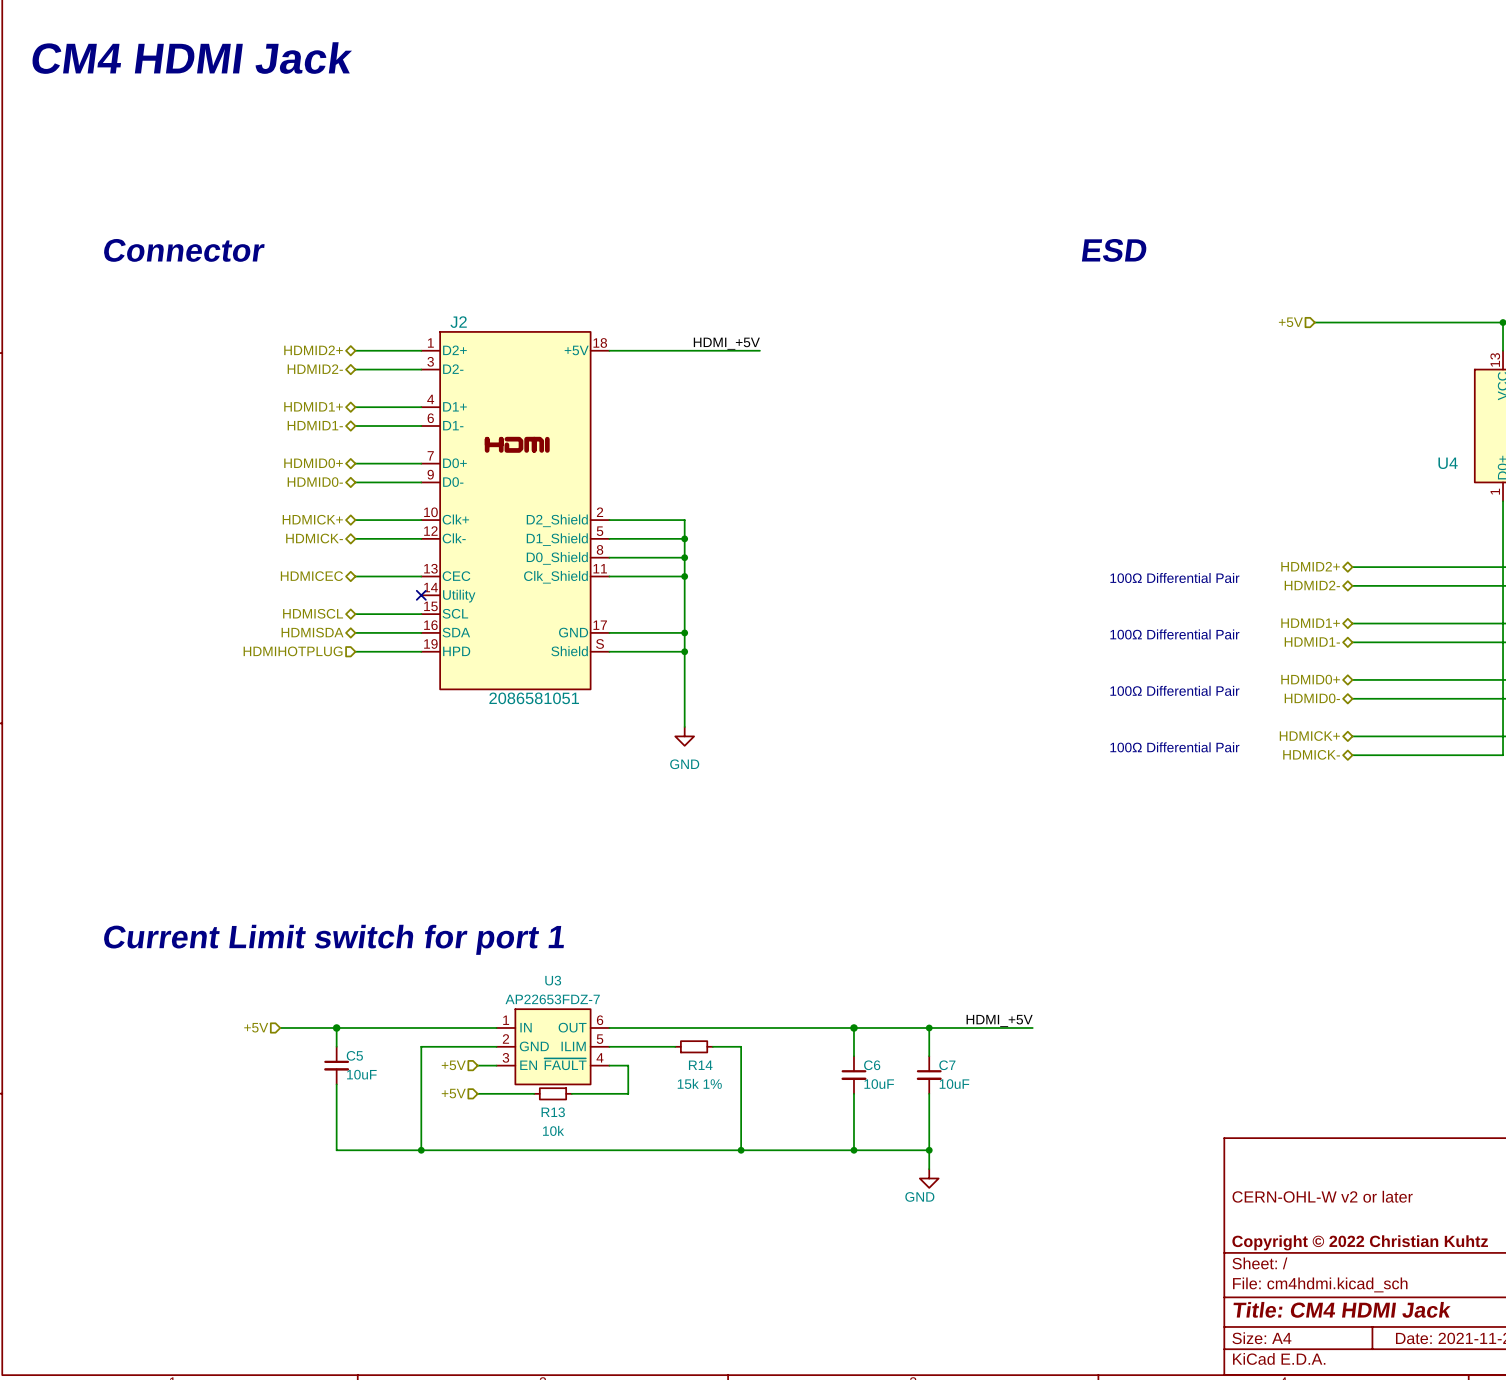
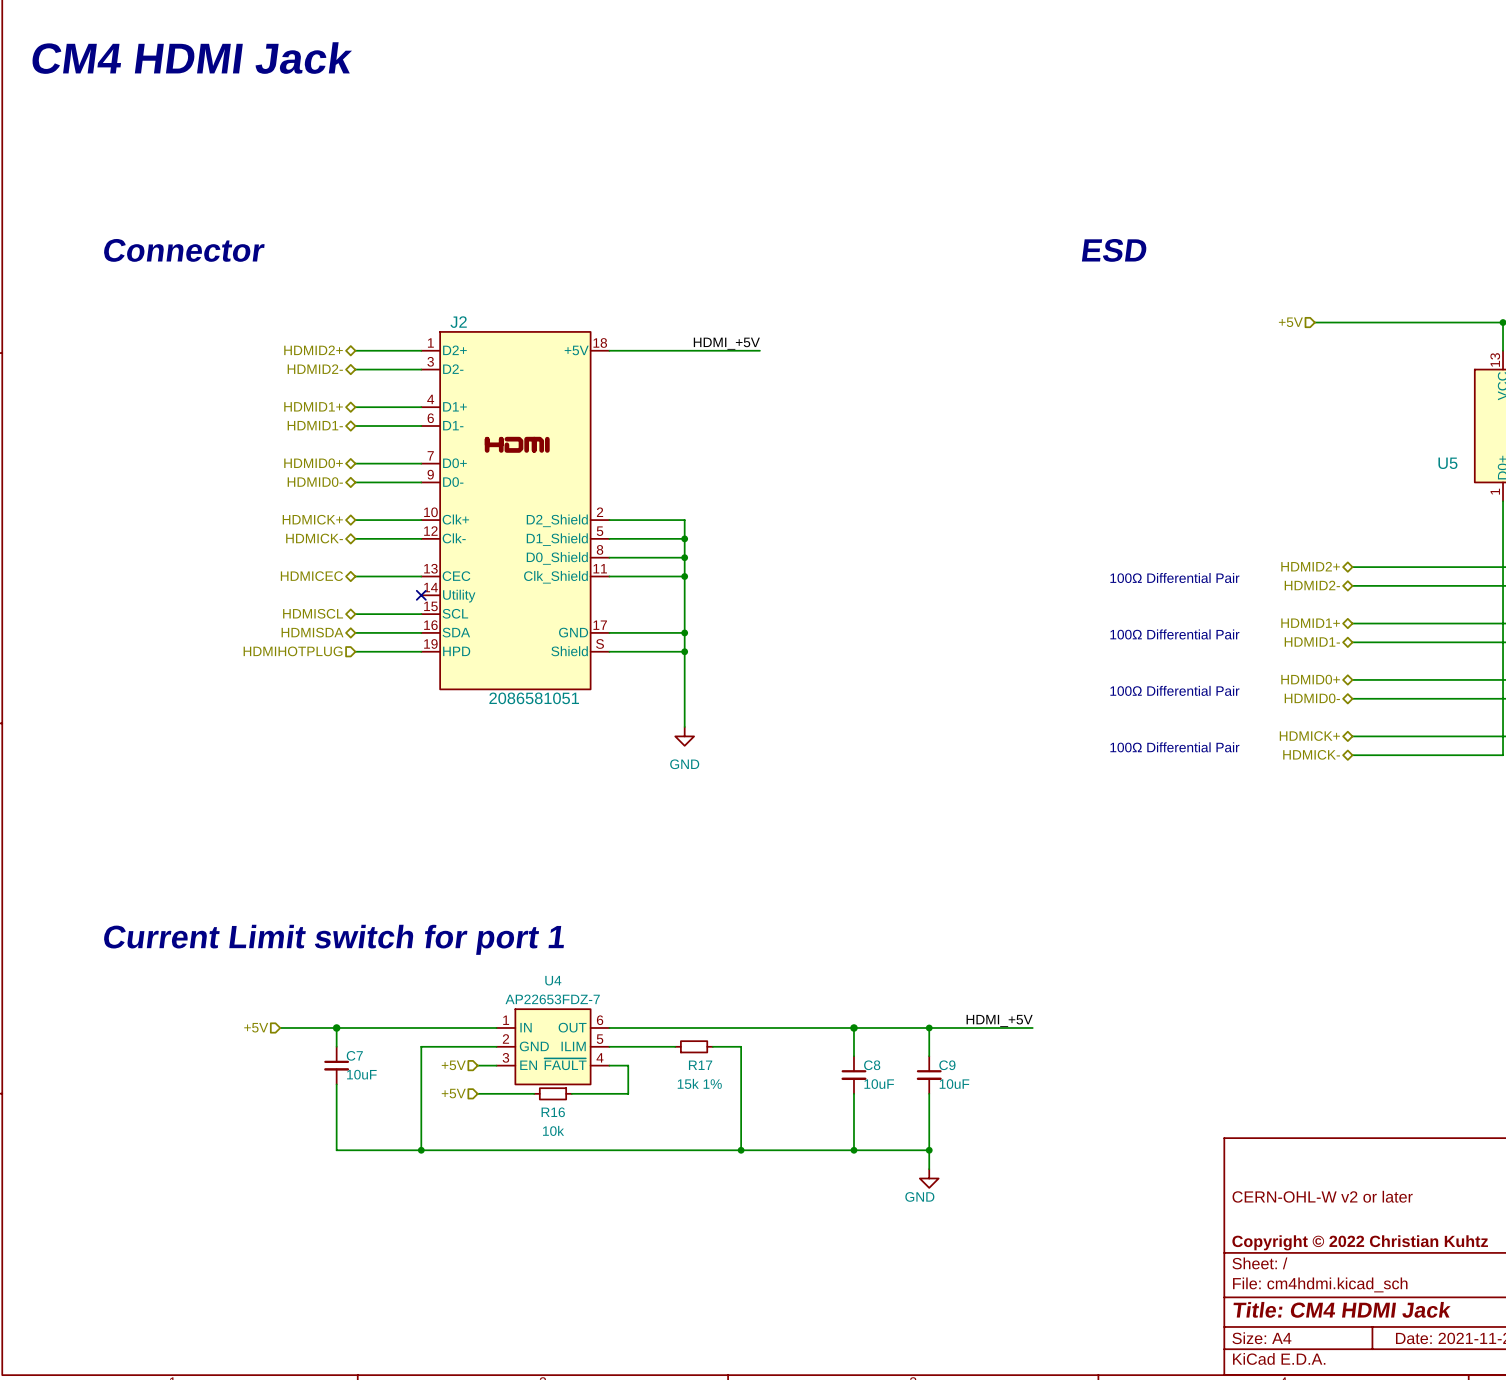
U4 name: U4 (1448, 463) -> U5 (1447, 463)
U3 name: U3 (553, 980) -> U4 (553, 980)
C5 name: C5 (354, 1055) -> C7 (354, 1055)
R14 name: R14 (700, 1065) -> R17 (700, 1065)
C6 name: C6 (872, 1065) -> C8 (872, 1065)
C7 name: C7 (947, 1065) -> C9 (947, 1065)
R13 name: R13 (553, 1112) -> R16 (553, 1112)

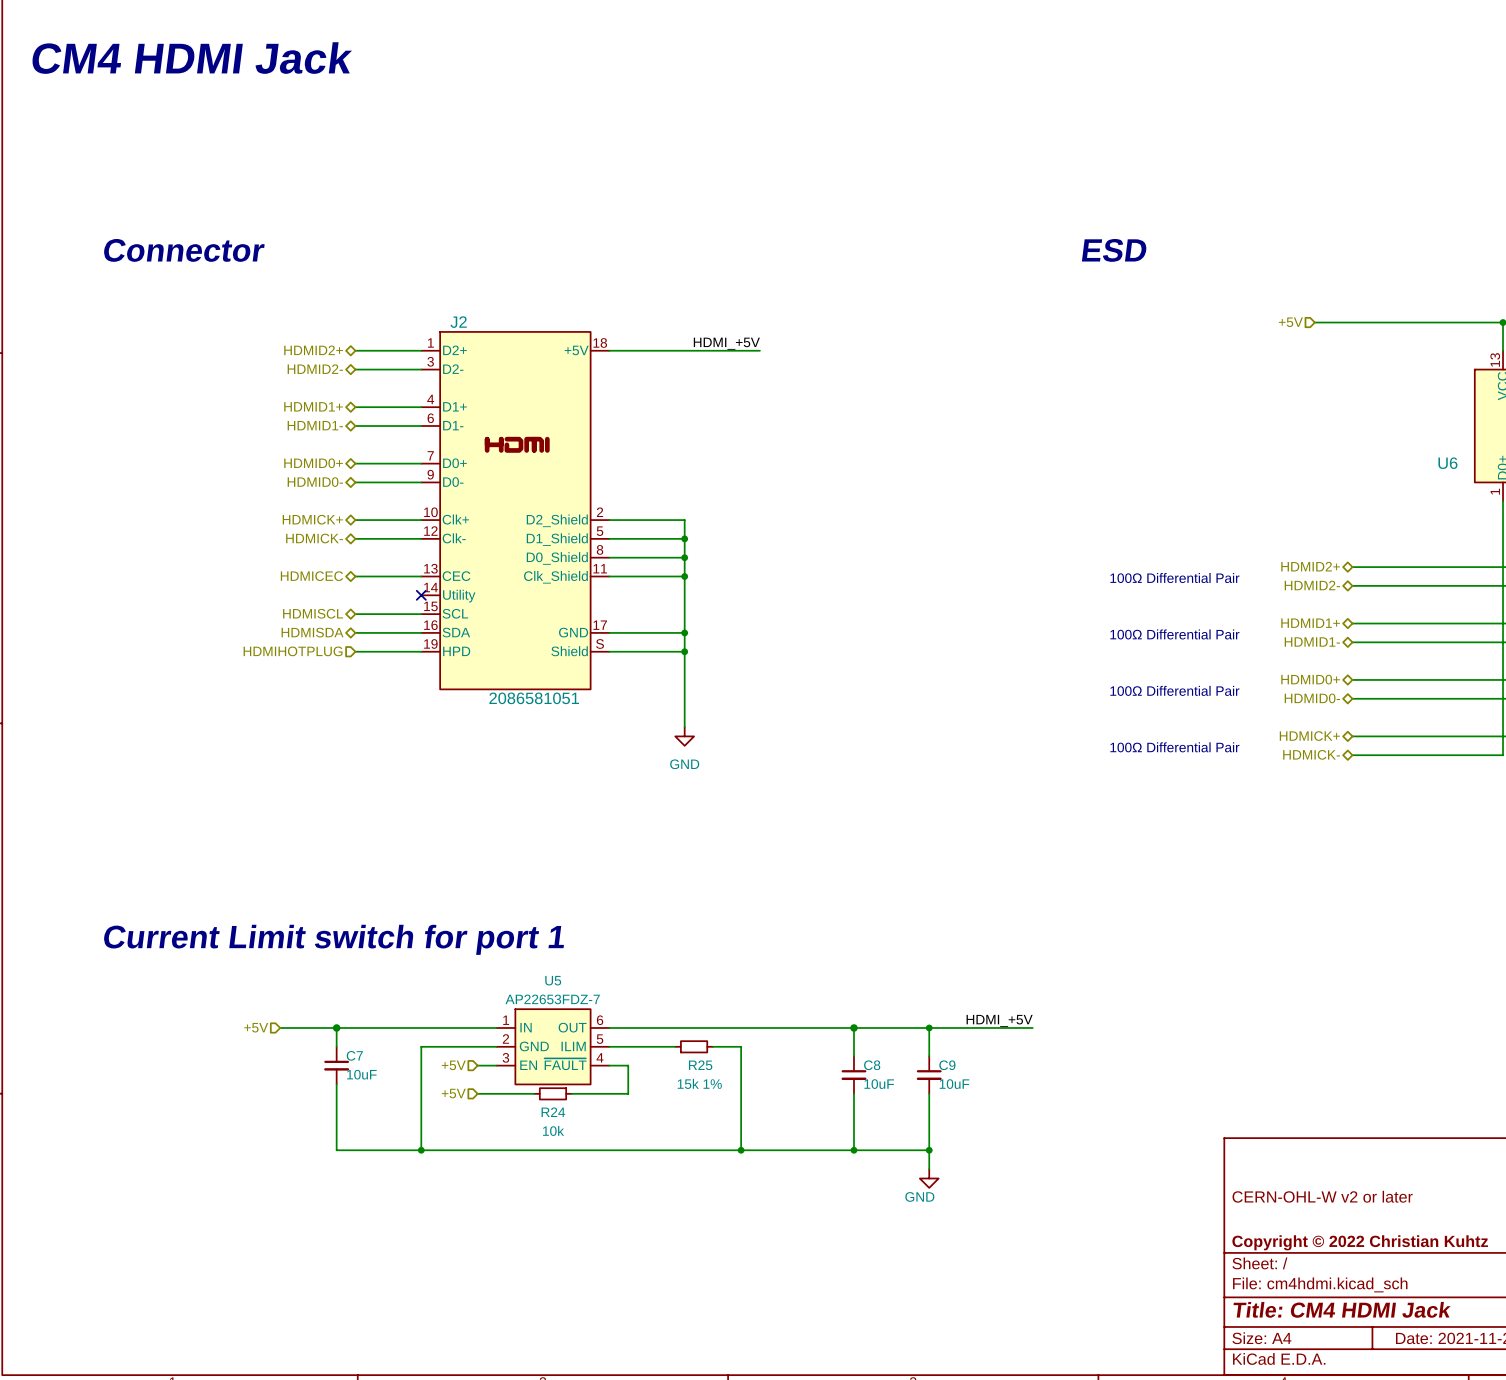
U5 name: U5 (1447, 463) -> U6 (1447, 463)
U4 name: U4 (553, 980) -> U5 (553, 980)
R17 name: R17 (700, 1065) -> R25 (700, 1065)
R16 name: R16 (553, 1112) -> R24 (553, 1112)

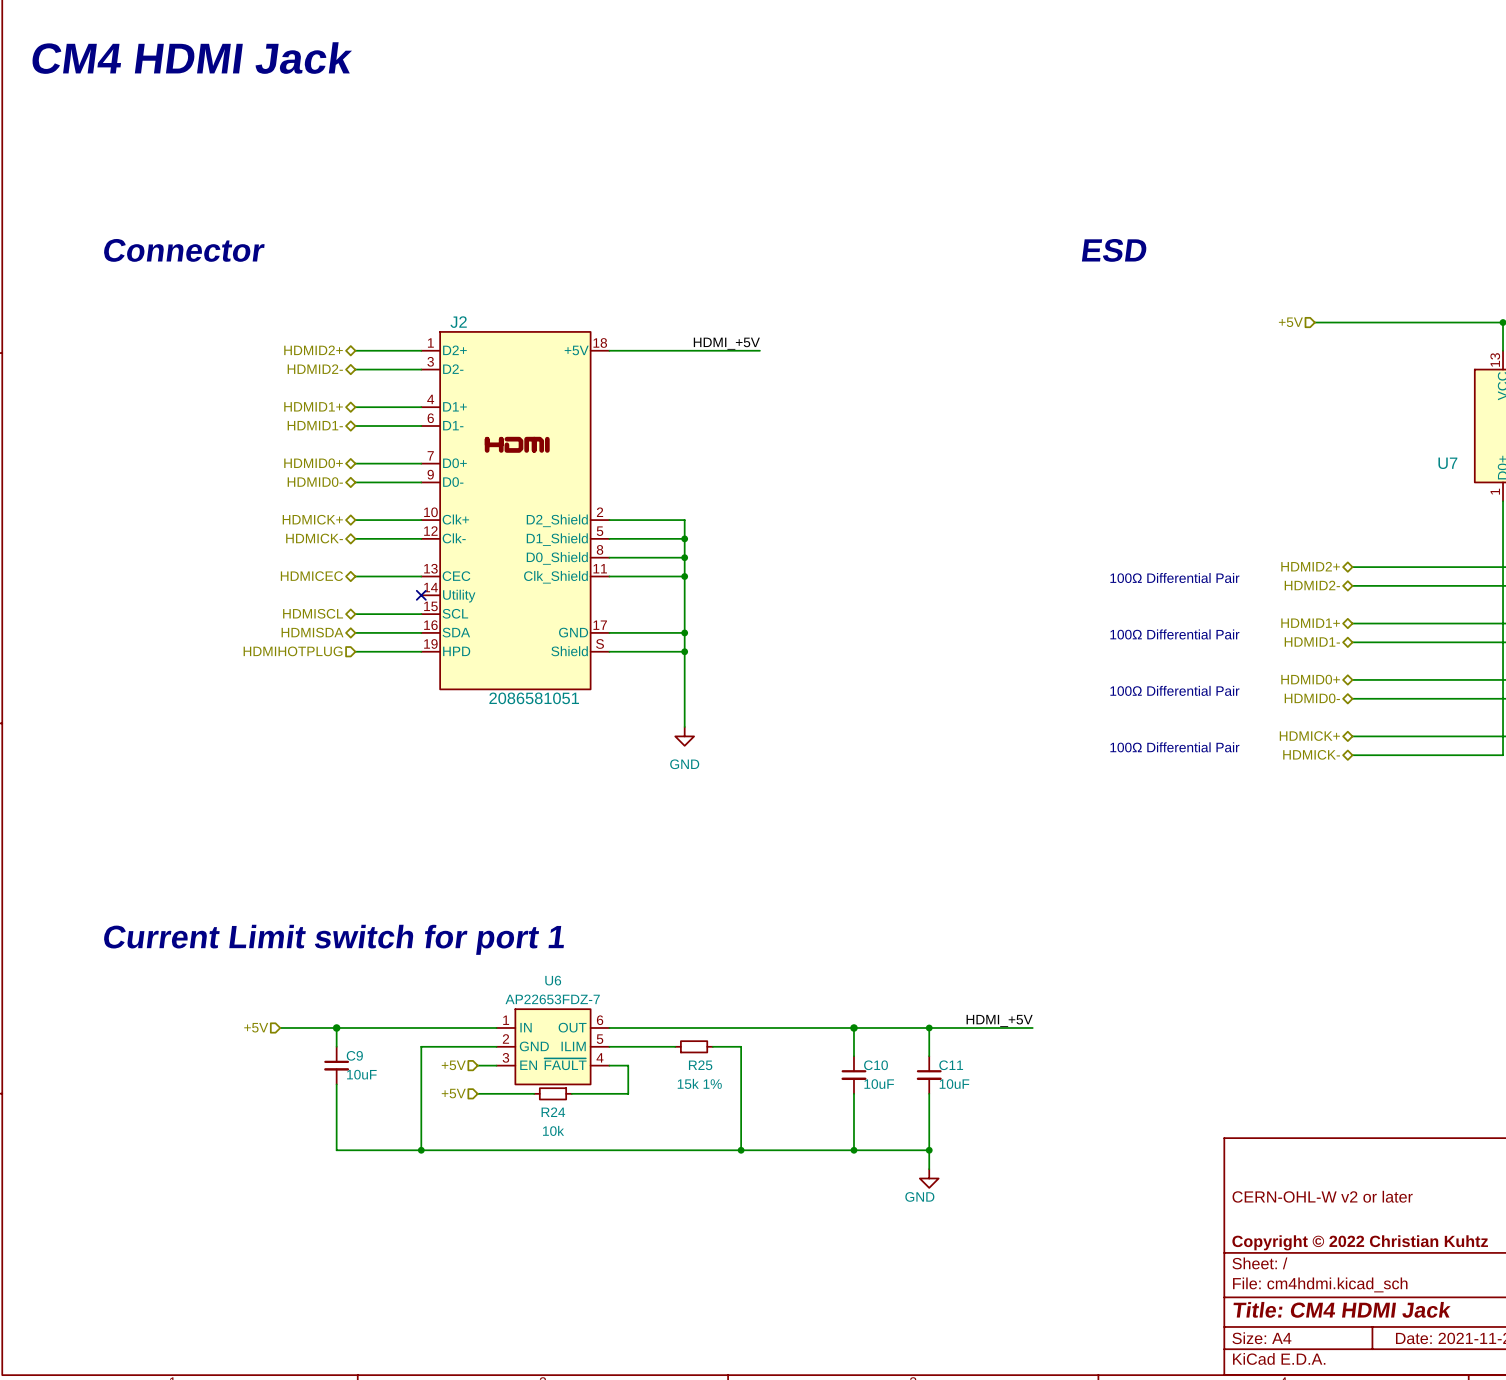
U6 name: U6 (1447, 463) -> U7 (1447, 463)
U5 name: U5 (553, 980) -> U6 (553, 980)
C7 name: C7 (354, 1055) -> C9 (354, 1055)
C8 name: C8 (872, 1065) -> C10 (876, 1065)
C9 name: C9 (947, 1065) -> C11 (951, 1065)

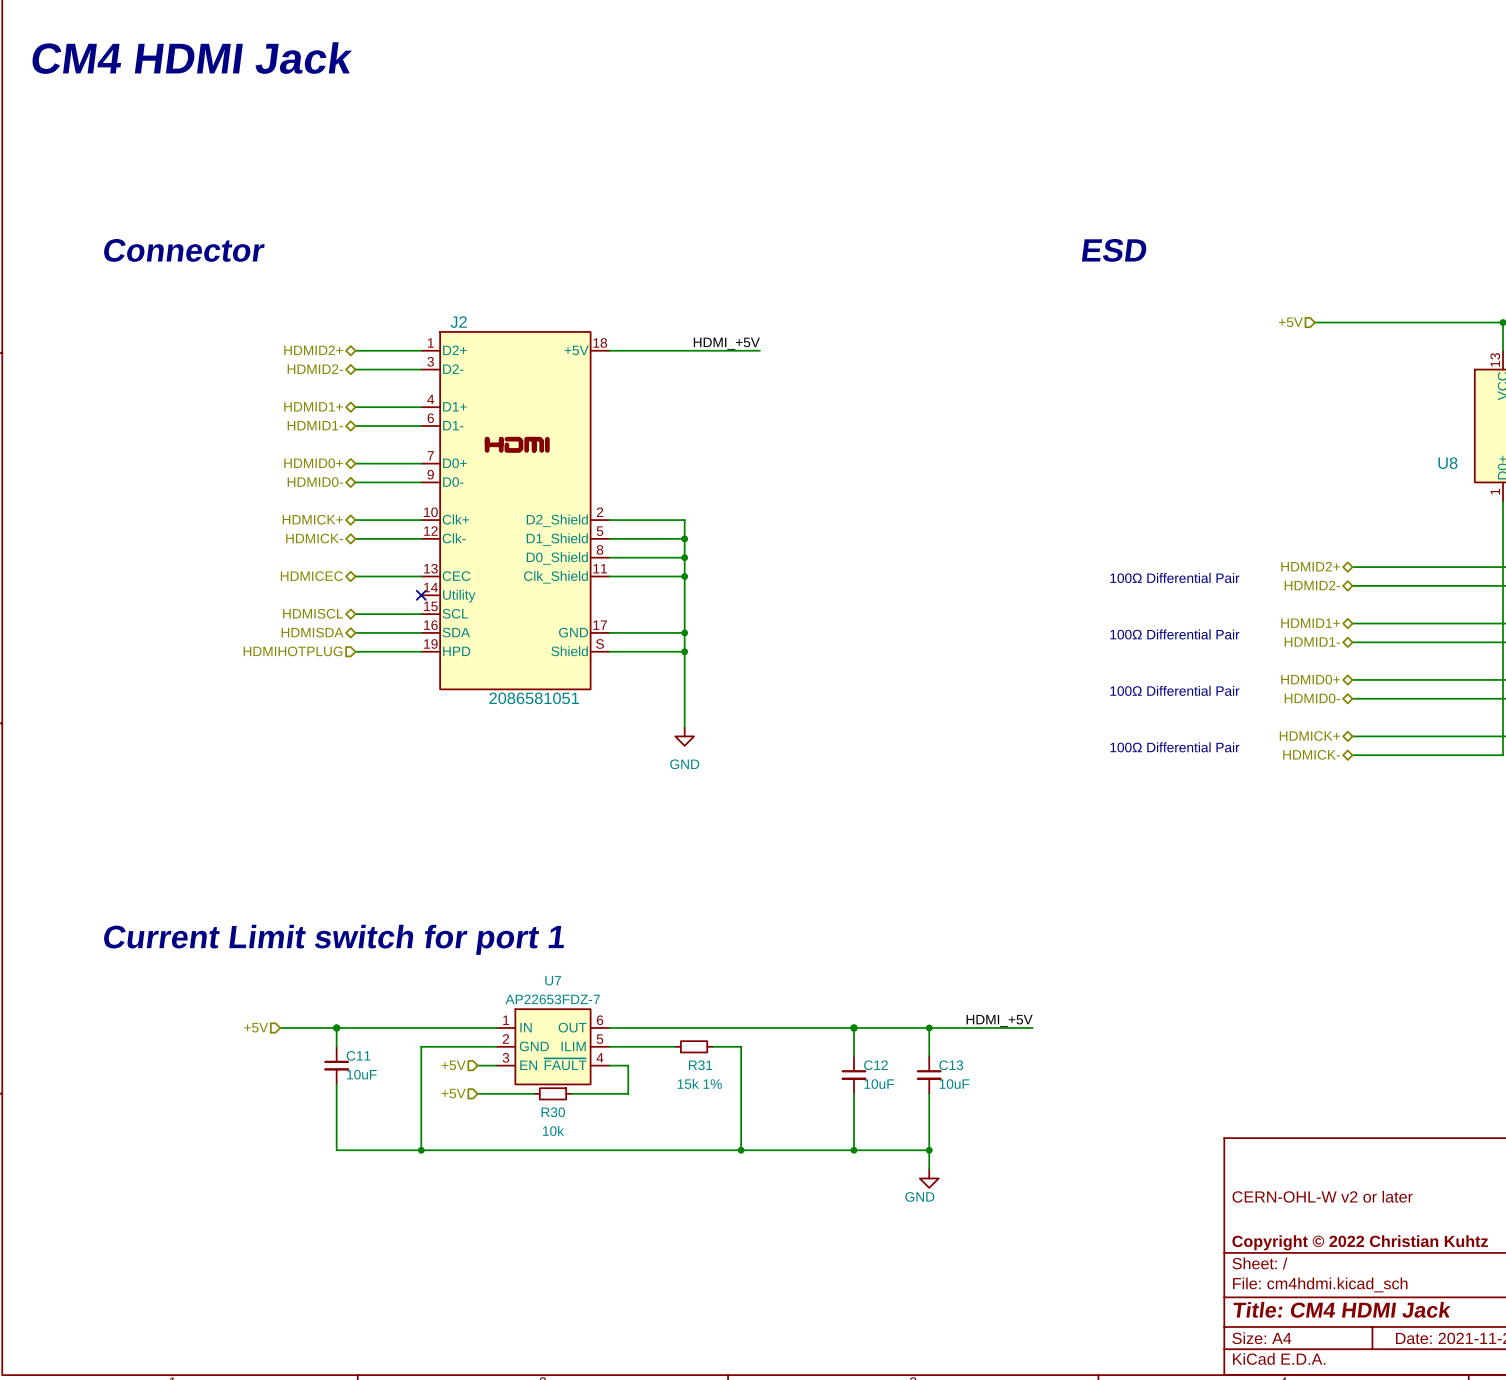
U7 name: U7 (1447, 463) -> U8 (1447, 463)
U6 name: U6 (553, 980) -> U7 (553, 980)
C9 name: C9 (354, 1055) -> C11 (358, 1055)
R25 name: R25 (700, 1065) -> R31 (700, 1065)
C10 name: C10 (876, 1065) -> C12 (875, 1065)
C11 name: C11 (951, 1065) -> C13 (951, 1065)
R24 name: R24 (553, 1112) -> R30 (553, 1112)

